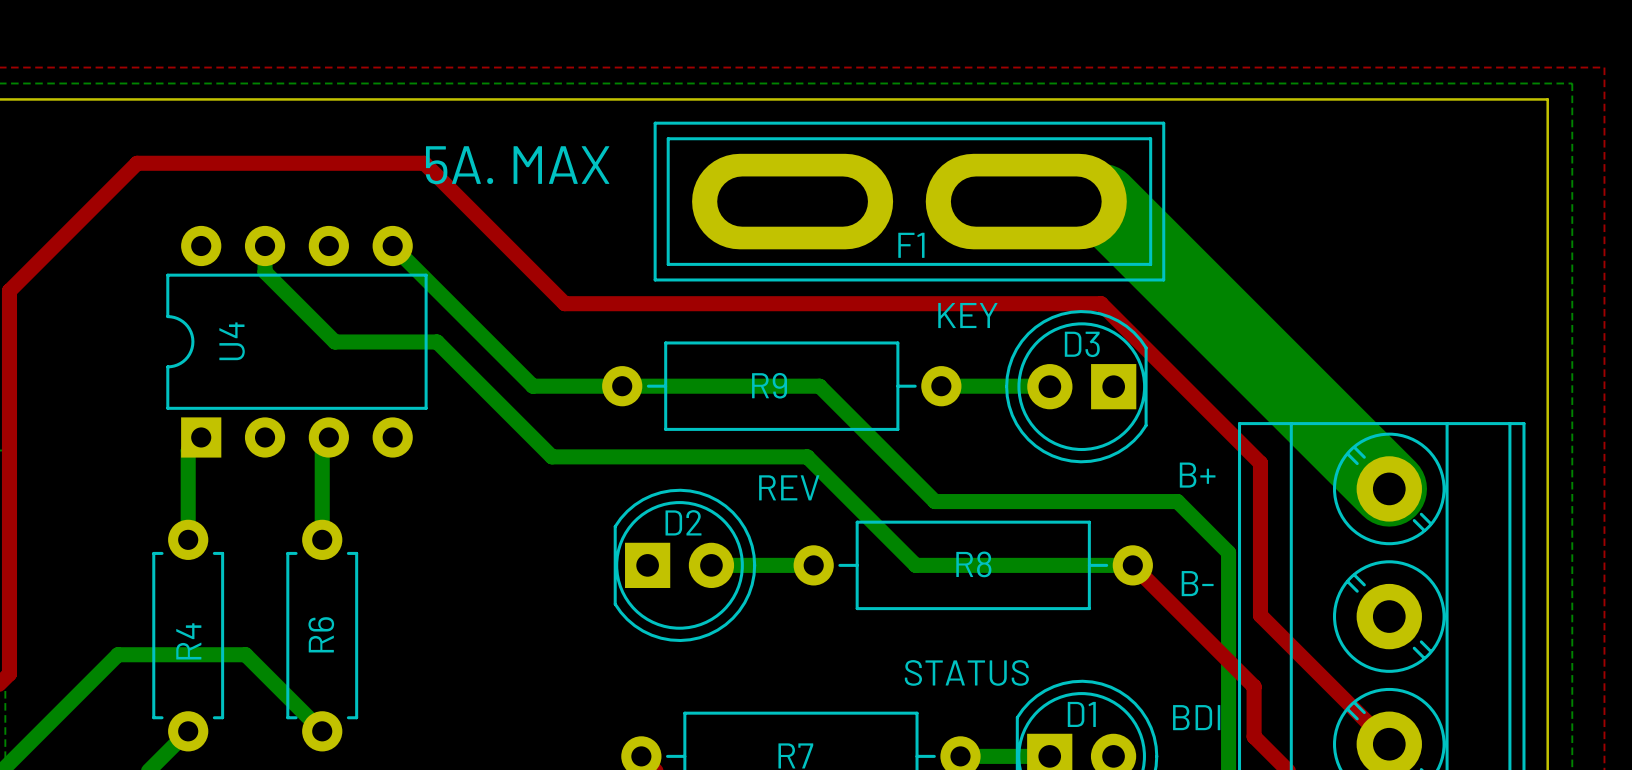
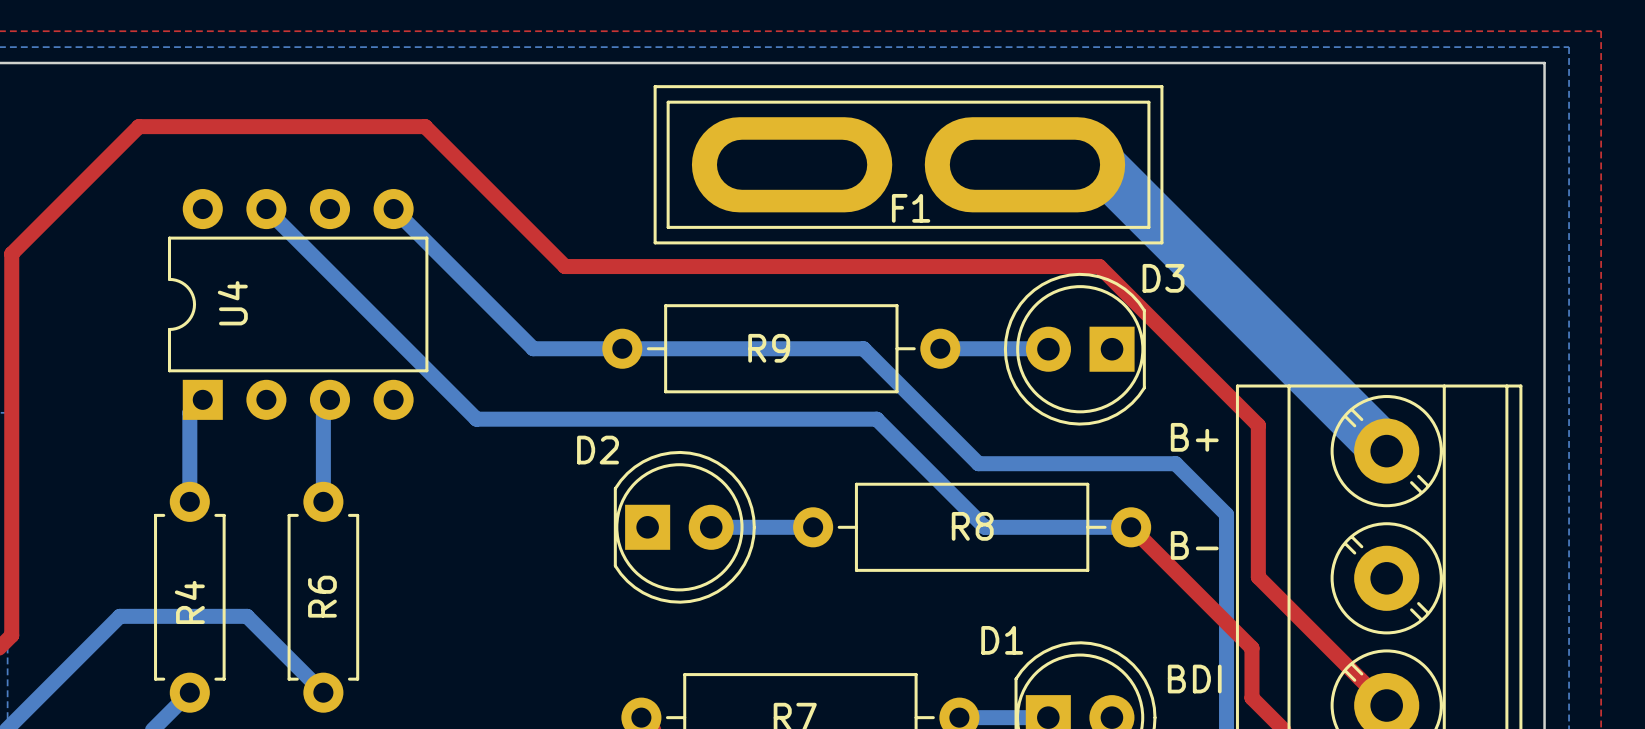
text: 5A. MAX (517, 165) -> none
bottom track width: thick (1101, 201) (1389, 488) -> thin (1100, 164) (1386, 451)
bottom track: (265, 246) (265, 272) (335, 341) (437, 341) (552, 456) -> (266, 209) (476, 419) (552, 419)
text: KEY (967, 315) -> none
D3 name position: D3 (1082, 344) -> D3 (1163, 278)
bottom track: (819, 386) (934, 501) (979, 501) -> (819, 348) (863, 348) (978, 463)
bottom track: (807, 456) (915, 565) (986, 565) -> (806, 419) (876, 419) (984, 527)
text: REV (789, 487) -> none
D2 name position: D2 (683, 522) -> D2 (598, 450)
text: STATUS (966, 672) -> none
D1 name position: D1 (1081, 714) -> D1 (1002, 640)

